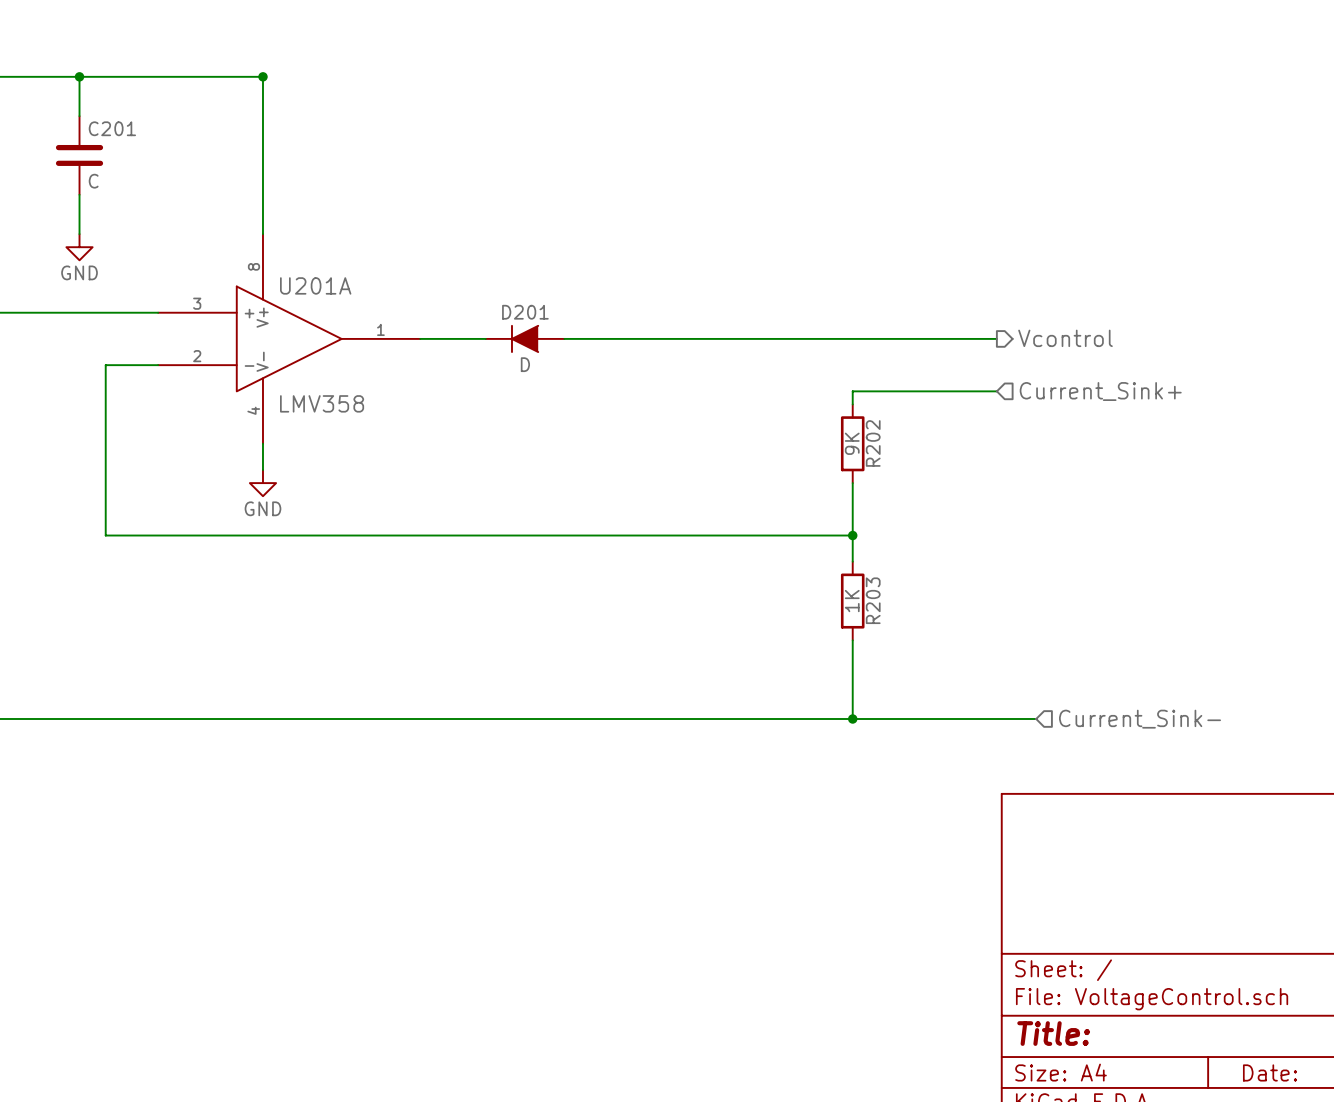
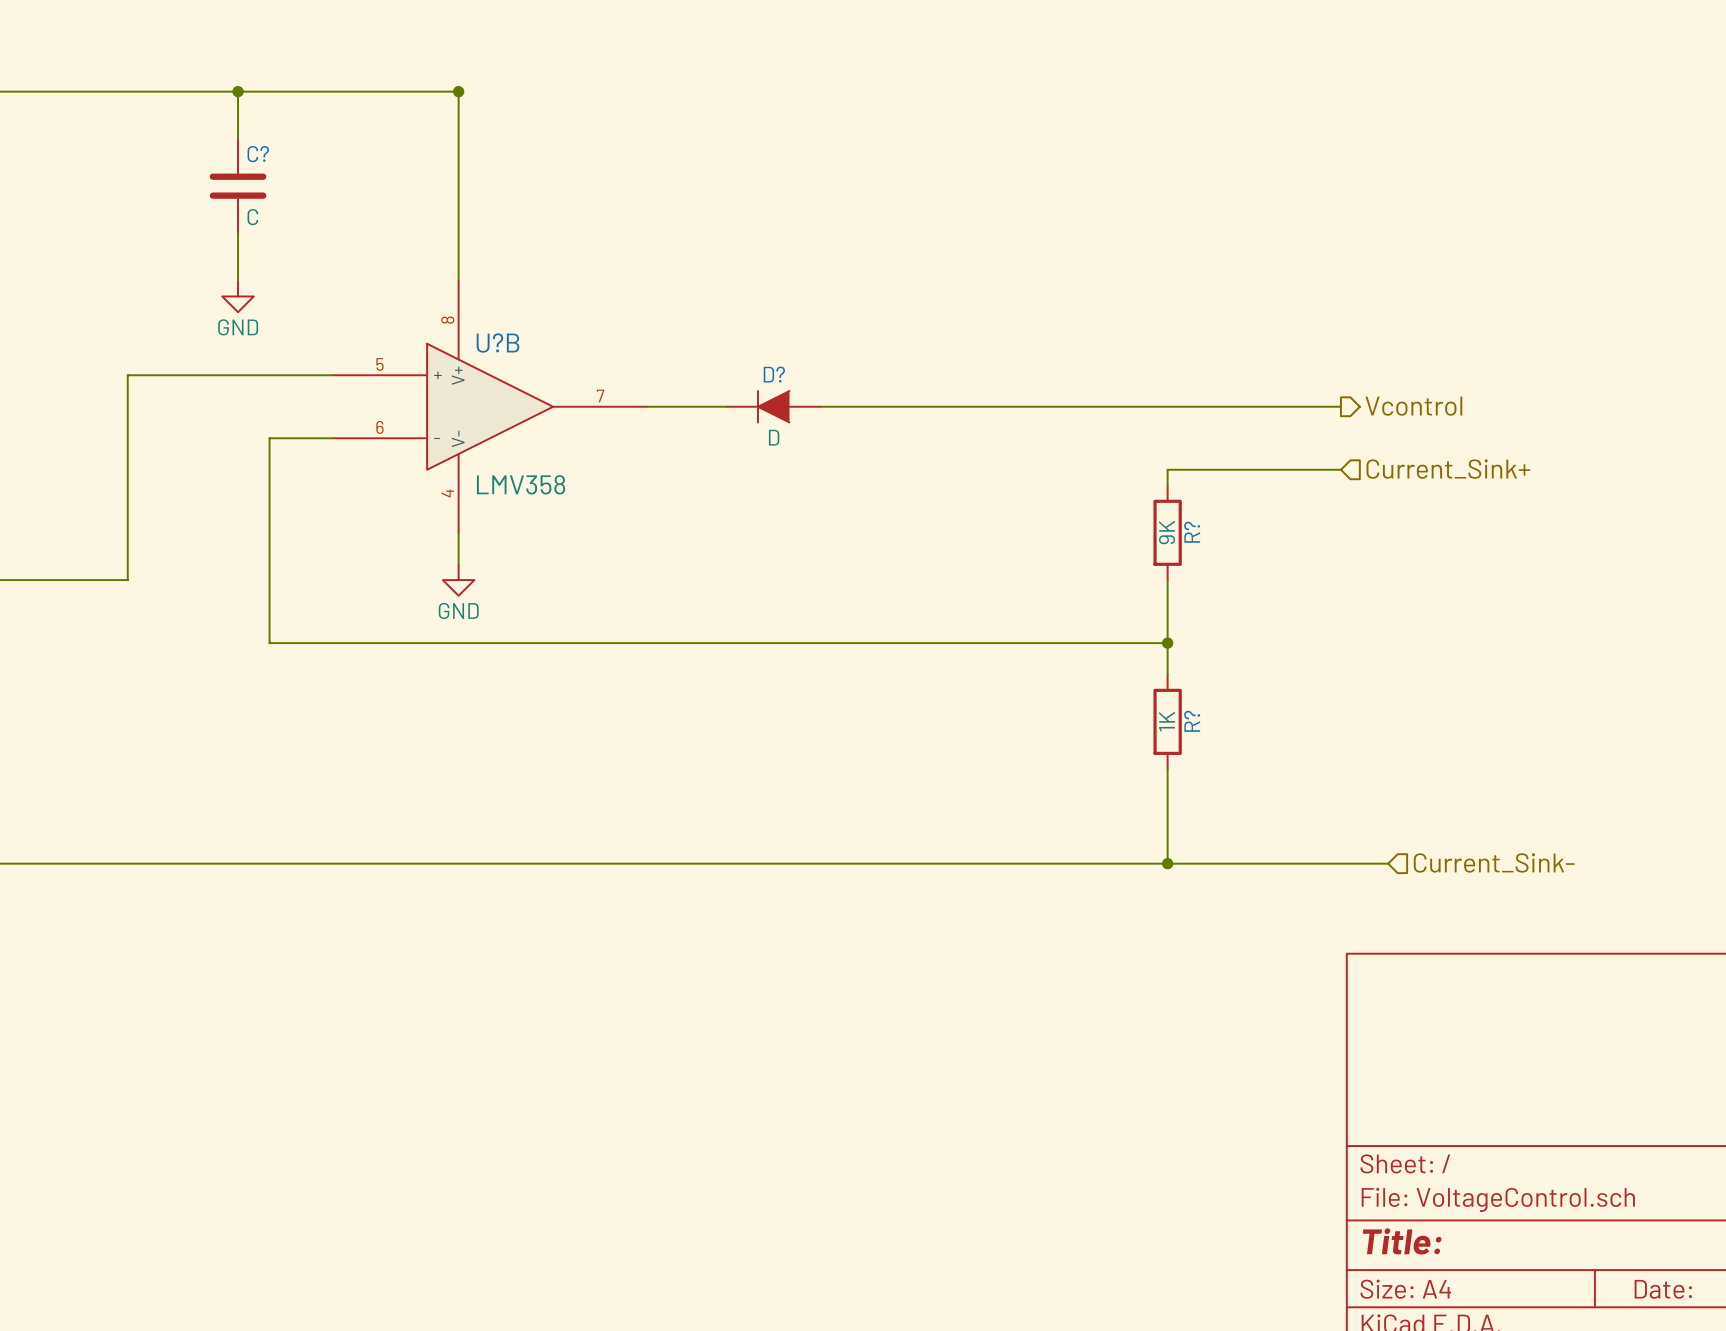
C201 name: C201 (112, 128) -> C? (258, 154)
U201A name: U201A (315, 285) -> U?B (498, 343)
U201A pin number: 3 (197, 303) -> 5 (379, 364)
D201 name: D201 (525, 312) -> D? (774, 374)
U201A pin number: 1 (380, 329) -> 7 (600, 395)
U201A pin number: 2 (197, 356) -> 6 (379, 427)
R202 name: R202 (873, 443) -> R? (1192, 532)
R203 name: R203 (873, 600) -> R? (1192, 721)

